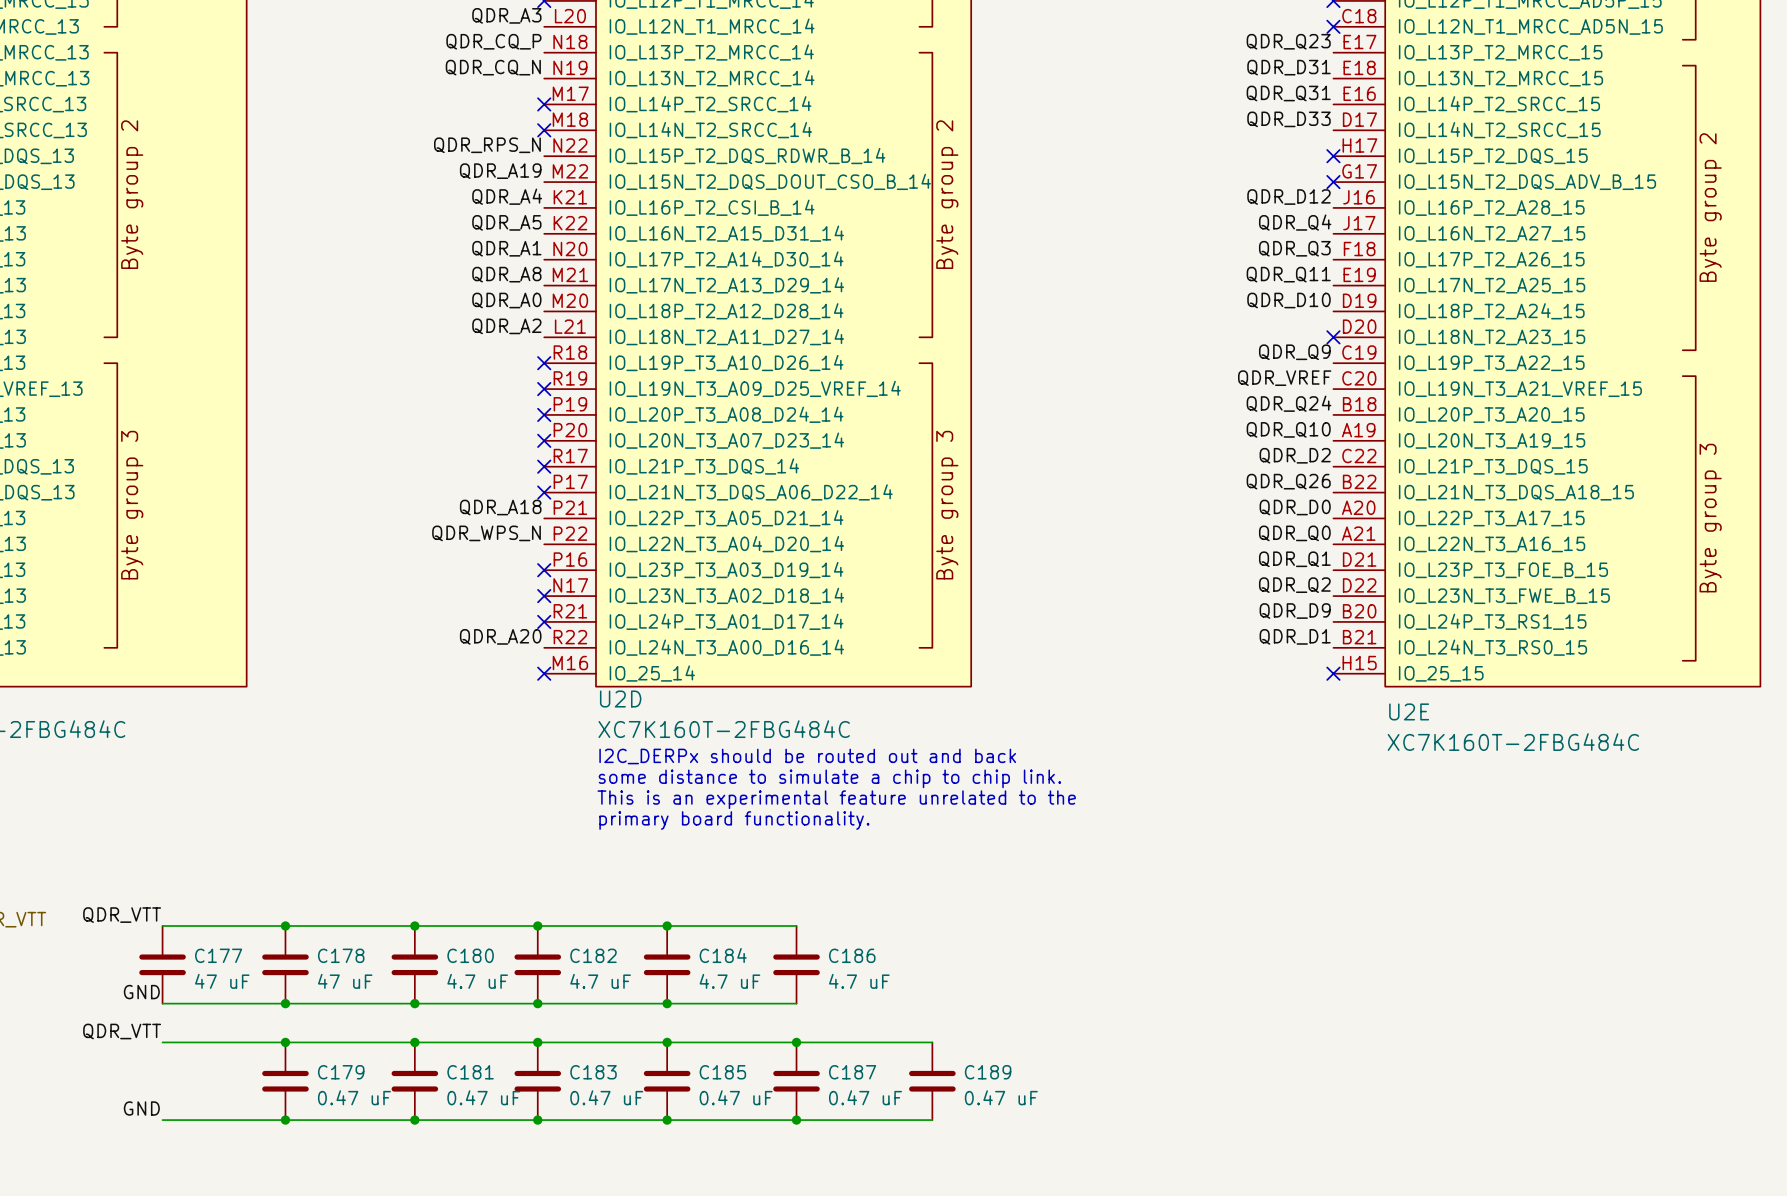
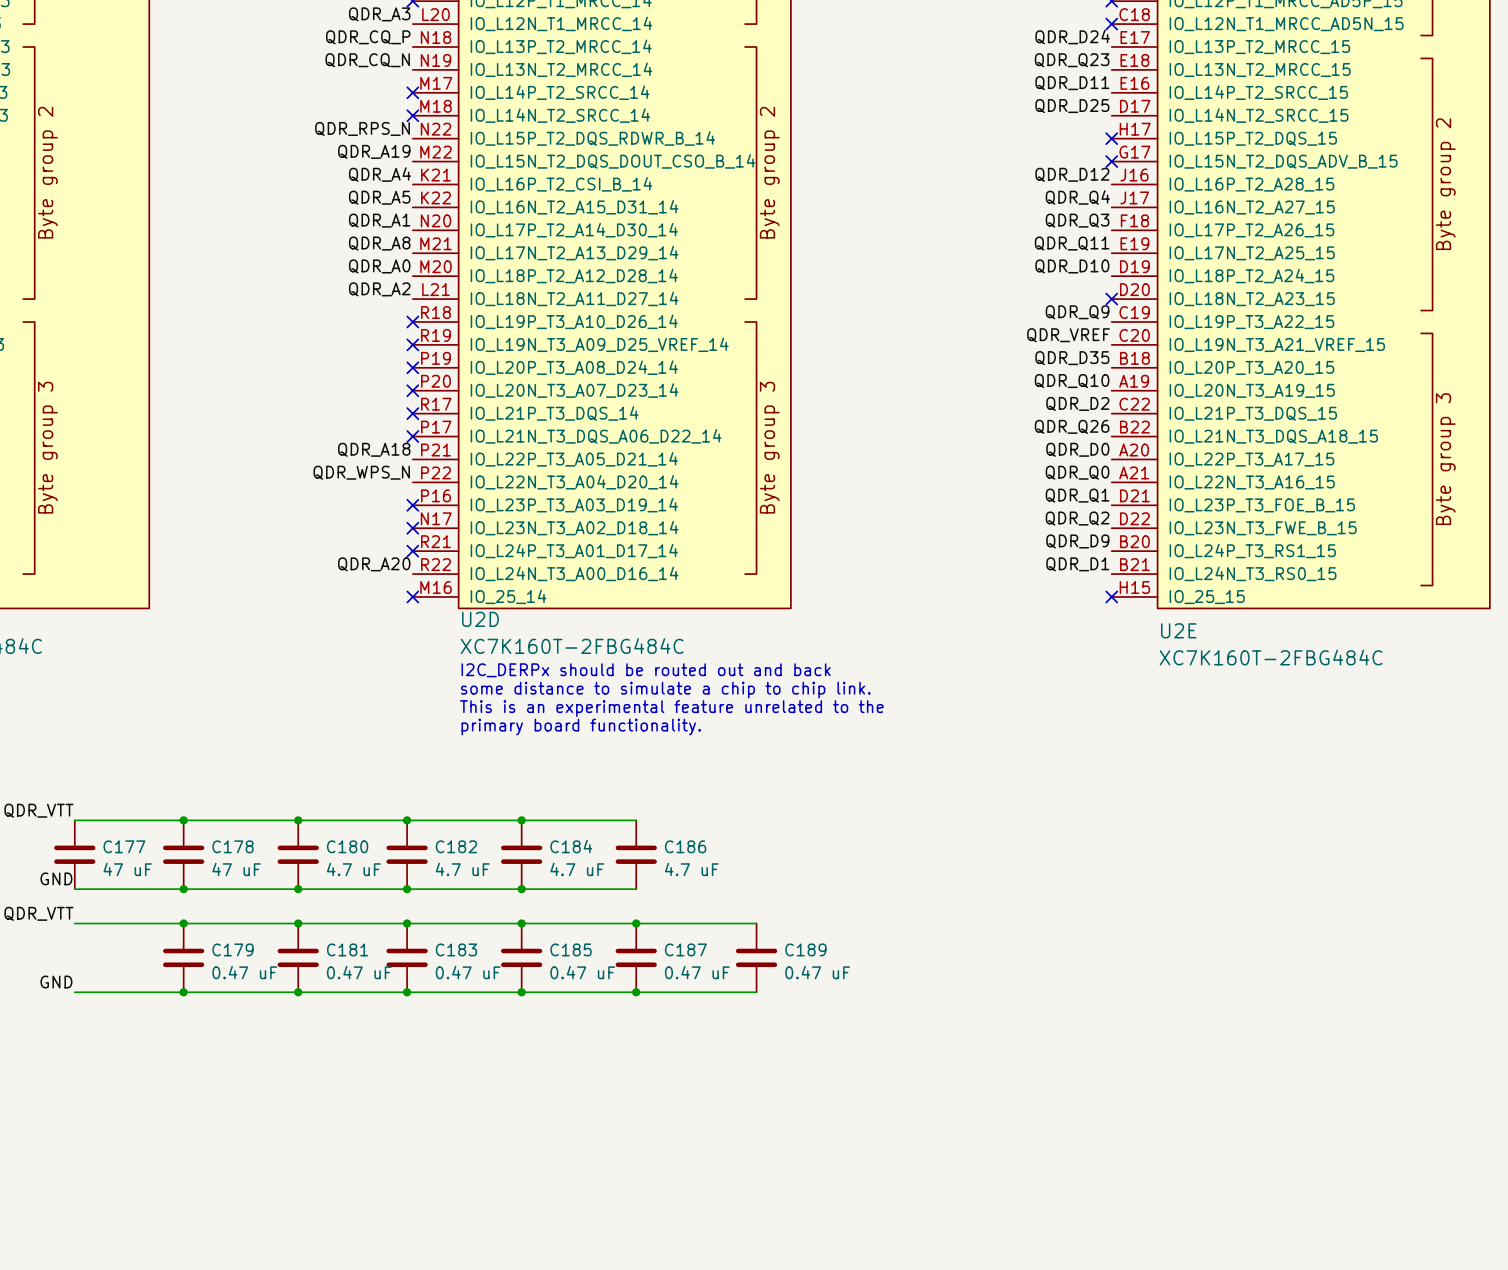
label: QDR_Q23 (1288, 41) -> QDR_D24 (1072, 37)
label: QDR_D31 (1288, 67) -> QDR_Q23 (1072, 60)
label: QDR_Q31 (1288, 93) -> QDR_D11 (1072, 83)
label: QDR_D33 (1288, 119) -> QDR_D25 (1072, 106)
label: QDR_Q24 (1288, 403) -> QDR_D35 (1072, 358)

